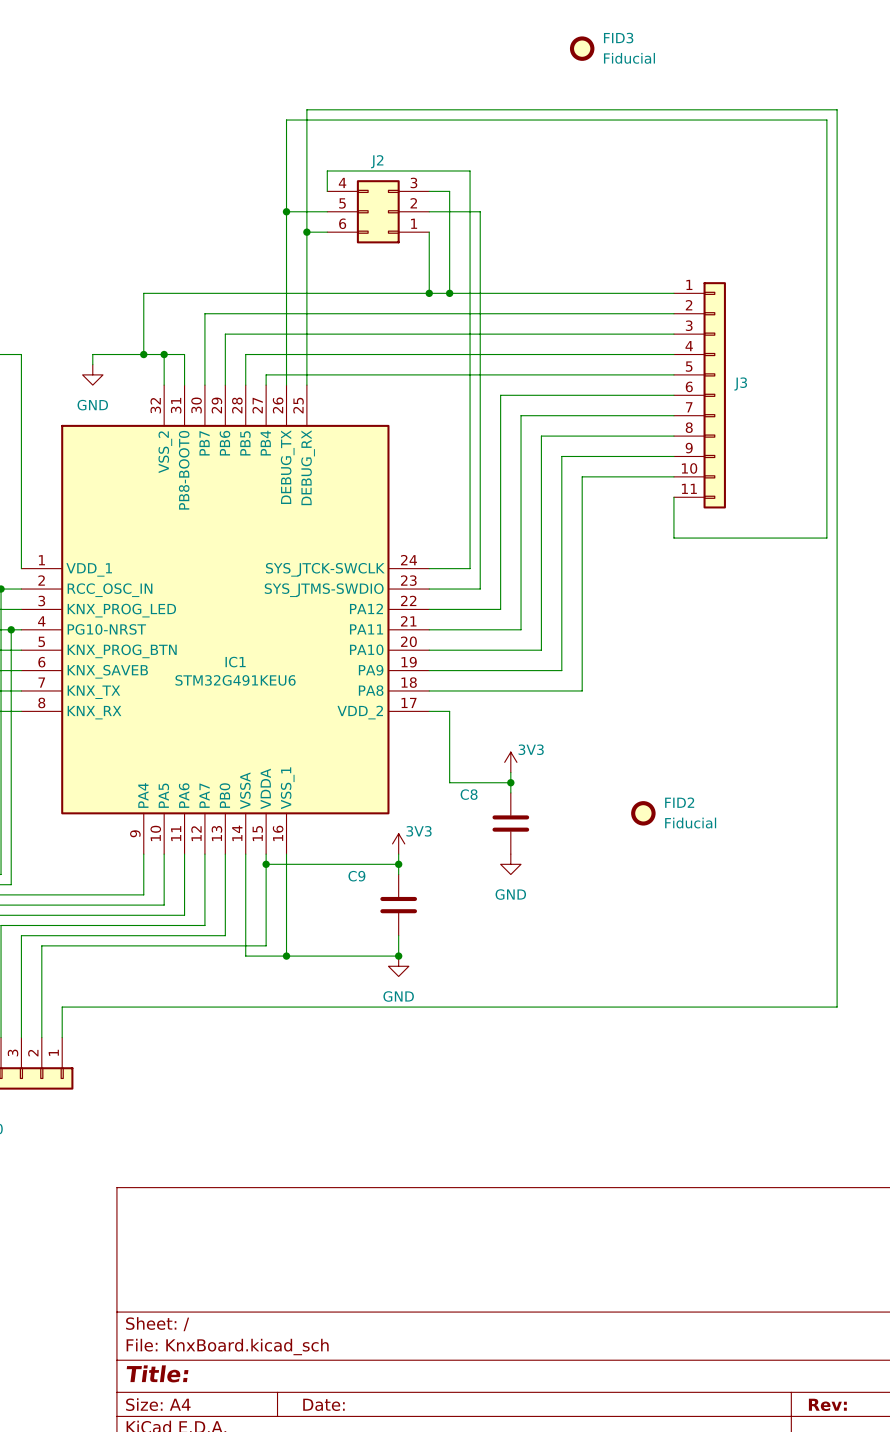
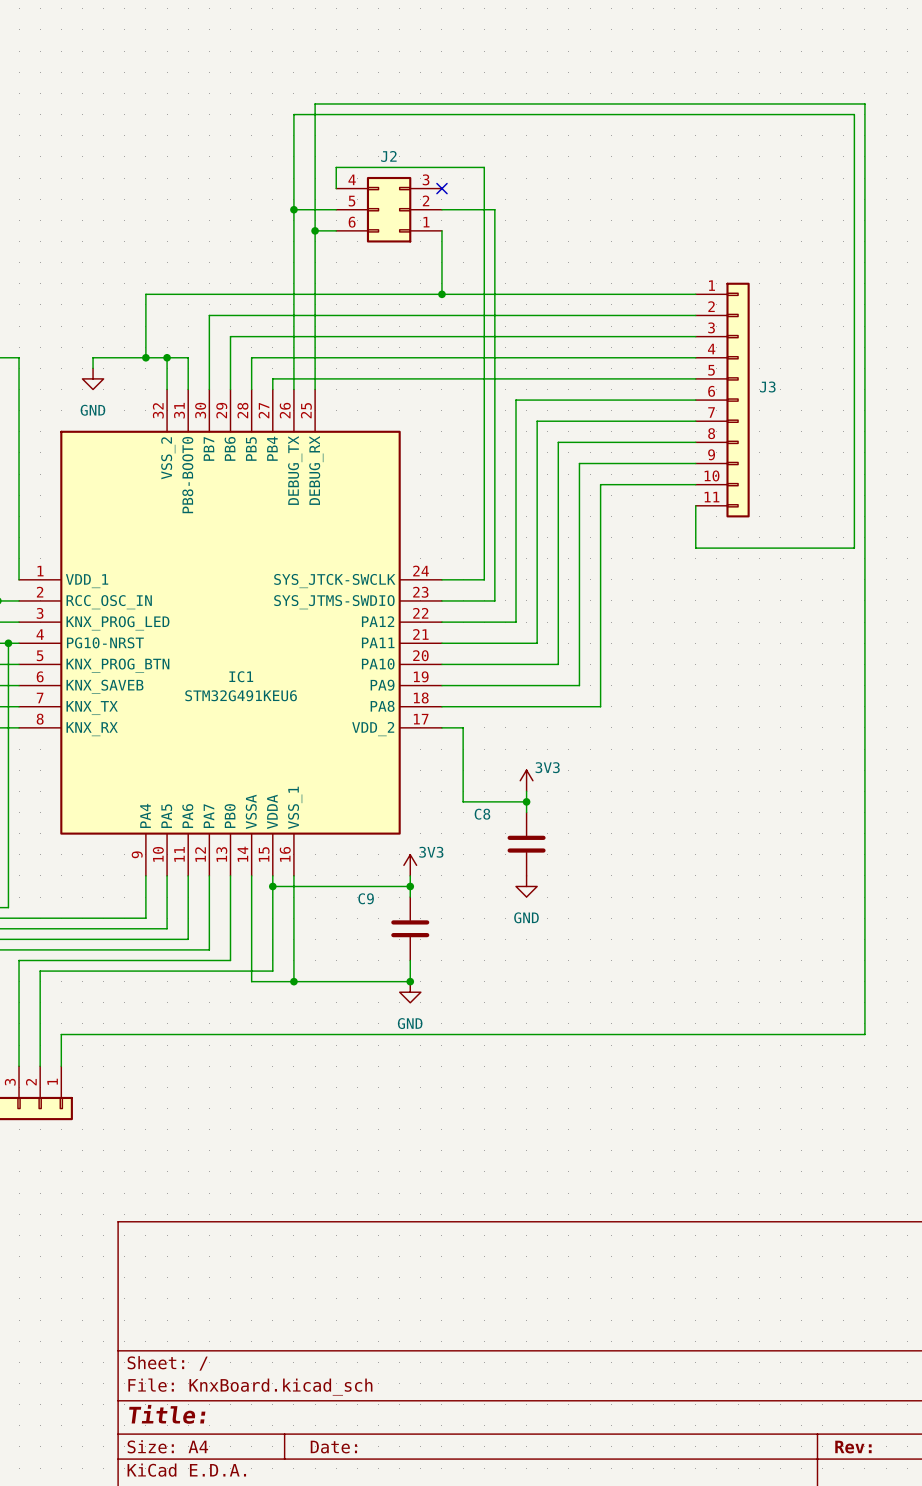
FID3: Fiducial (582, 48) -> none
wire: (429, 191) (449, 191) (449, 293) -> none
no-connect mark: none -> (441, 188)
junction: (449, 293) -> none
FID2: Fiducial (643, 813) -> none

